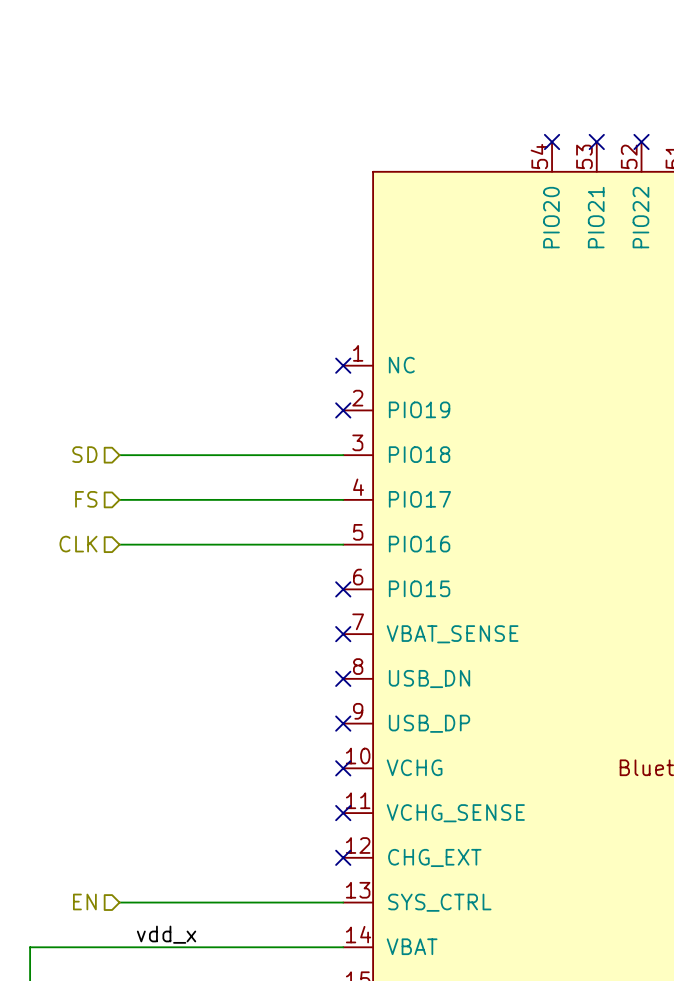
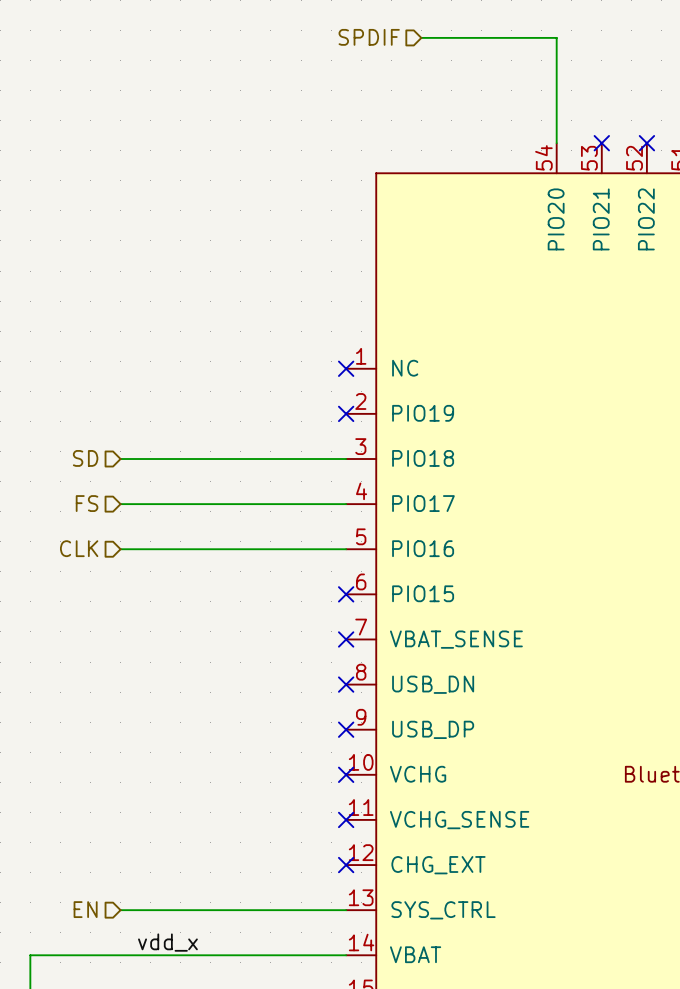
hierarchical label: none -> SPDIF (369, 37)
wire: none -> (421, 37) (556, 37) (556, 143)
no-connect mark: (552, 141) -> none

